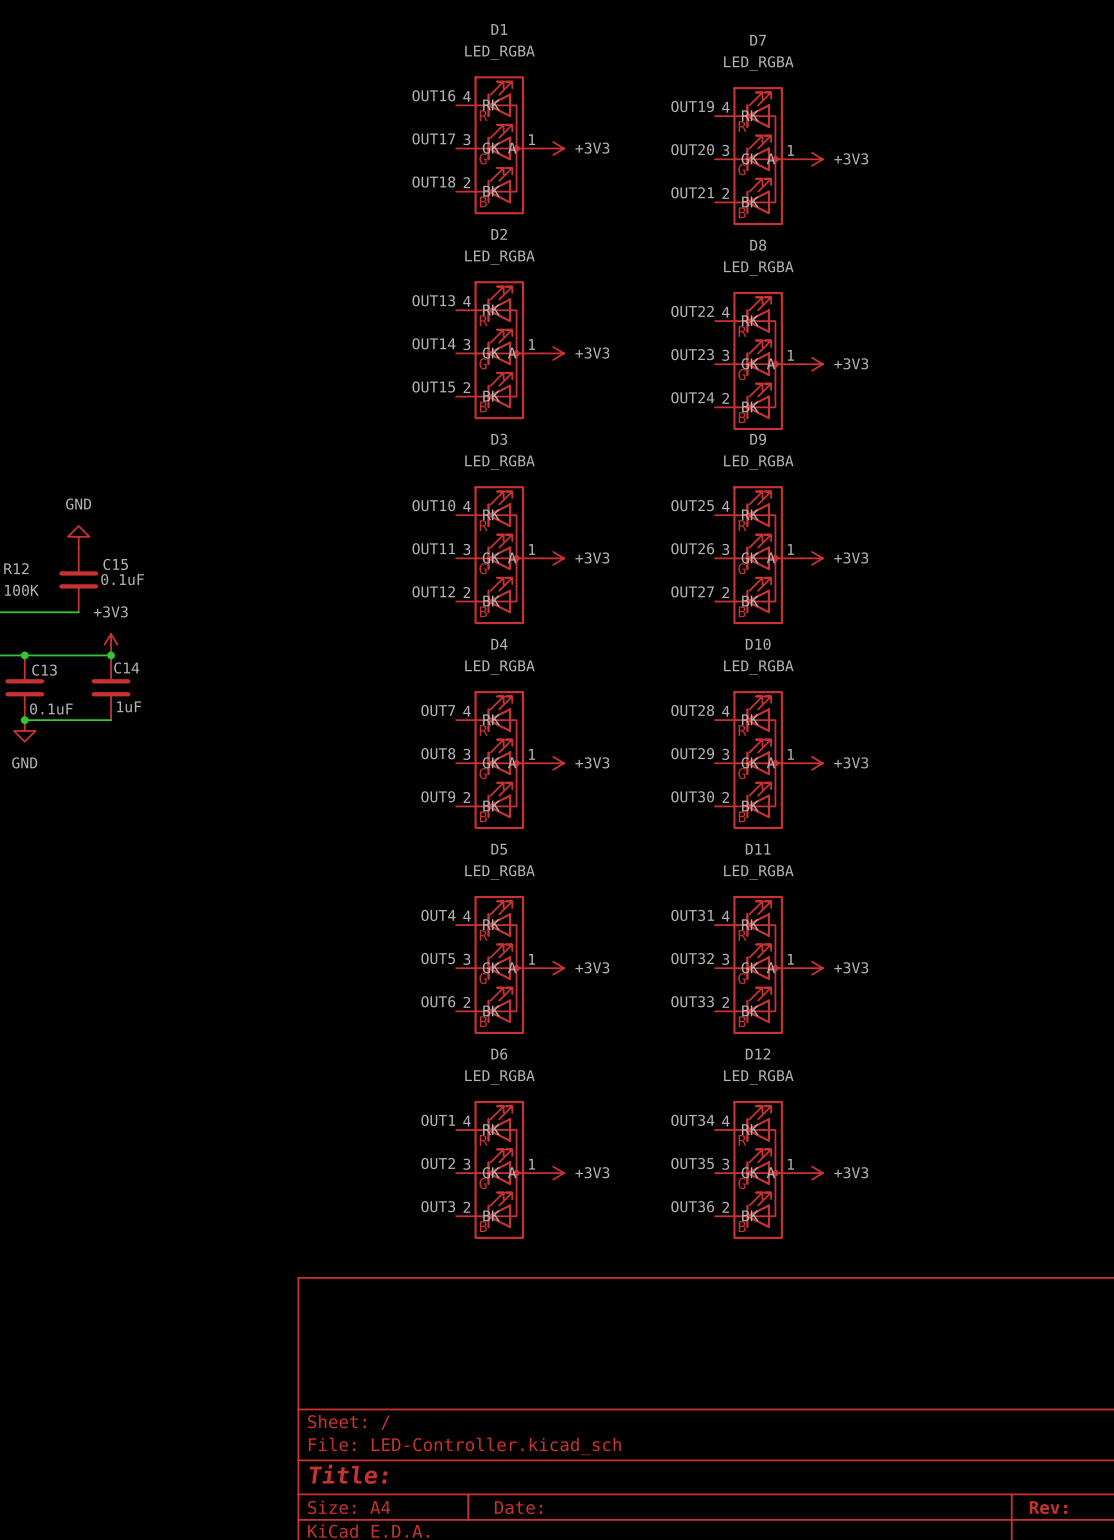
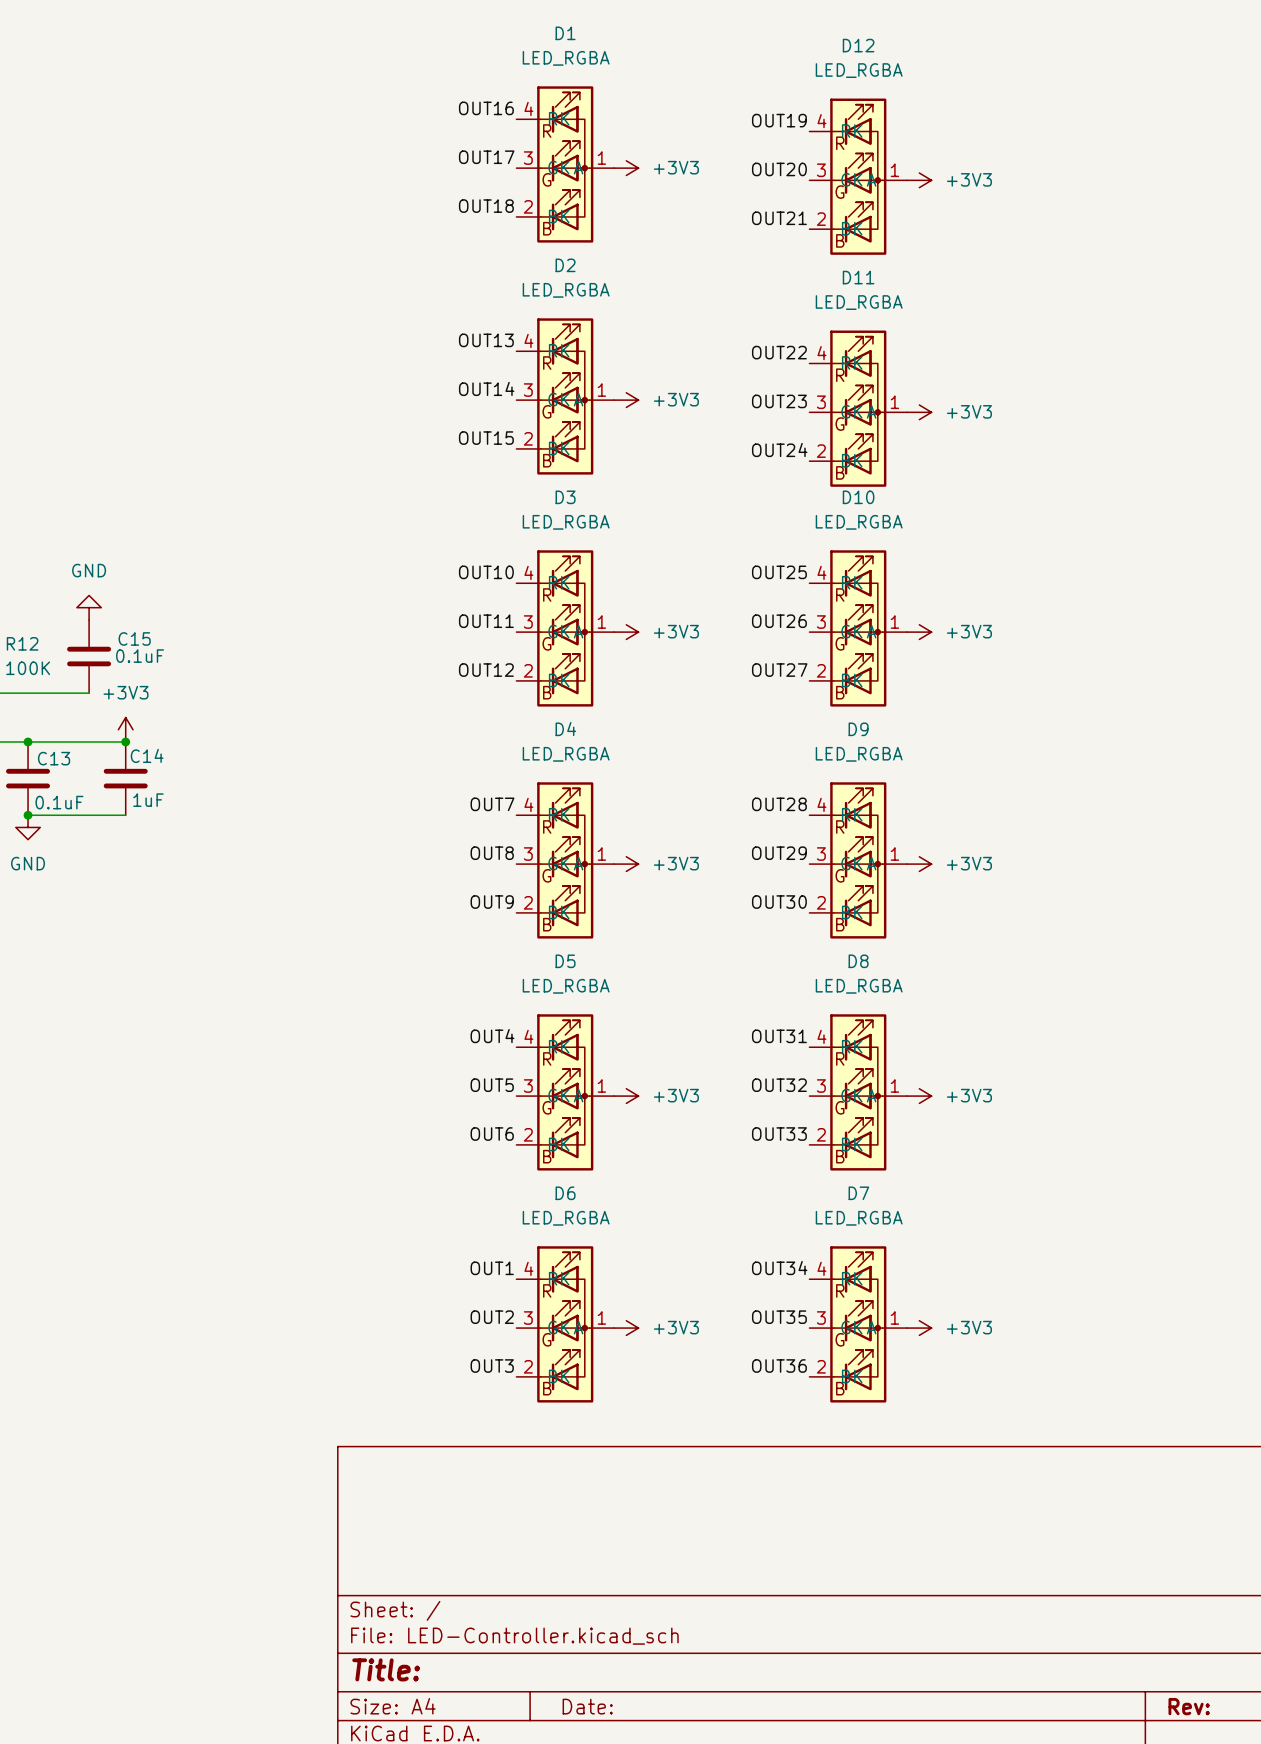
D7 name: D7 (758, 40) -> D12 (858, 45)
D8 name: D8 (758, 245) -> D11 (858, 277)
D9 name: D9 (758, 439) -> D10 (858, 497)
D10 name: D10 (758, 644) -> D9 (858, 729)
D11 name: D11 (758, 849) -> D8 (858, 961)
D12 name: D12 (758, 1053) -> D7 (858, 1193)

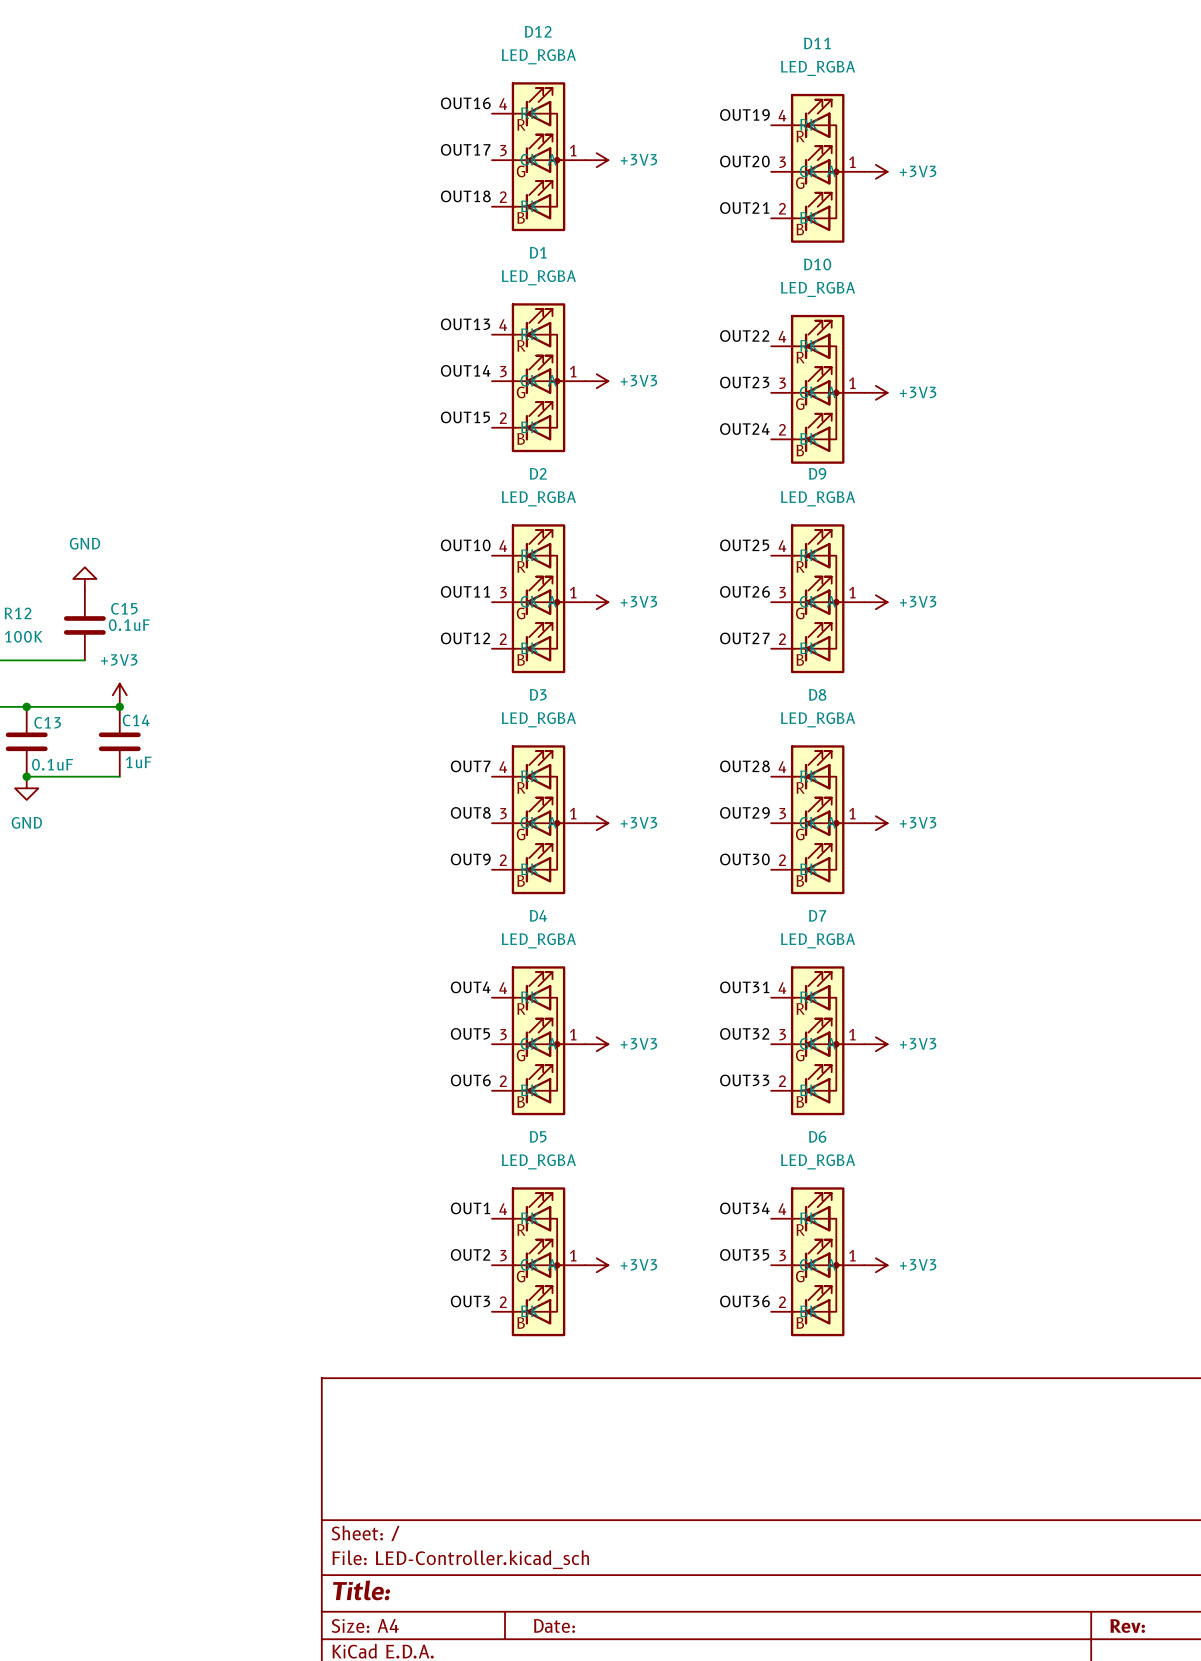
D1 name: D1 (565, 33) -> D12 (538, 31)
D12 name: D12 (858, 45) -> D11 (817, 43)
D2 name: D2 (565, 265) -> D1 (538, 252)
D11 name: D11 (858, 277) -> D10 (817, 264)
D3 name: D3 (565, 497) -> D2 (538, 473)
D10 name: D10 (858, 497) -> D9 (817, 473)
D4 name: D4 (565, 729) -> D3 (538, 694)
D9 name: D9 (858, 729) -> D8 (817, 694)
D5 name: D5 (565, 961) -> D4 (538, 915)
D8 name: D8 (858, 961) -> D7 (817, 915)
D6 name: D6 (565, 1193) -> D5 (538, 1136)
D7 name: D7 (858, 1193) -> D6 (817, 1136)

